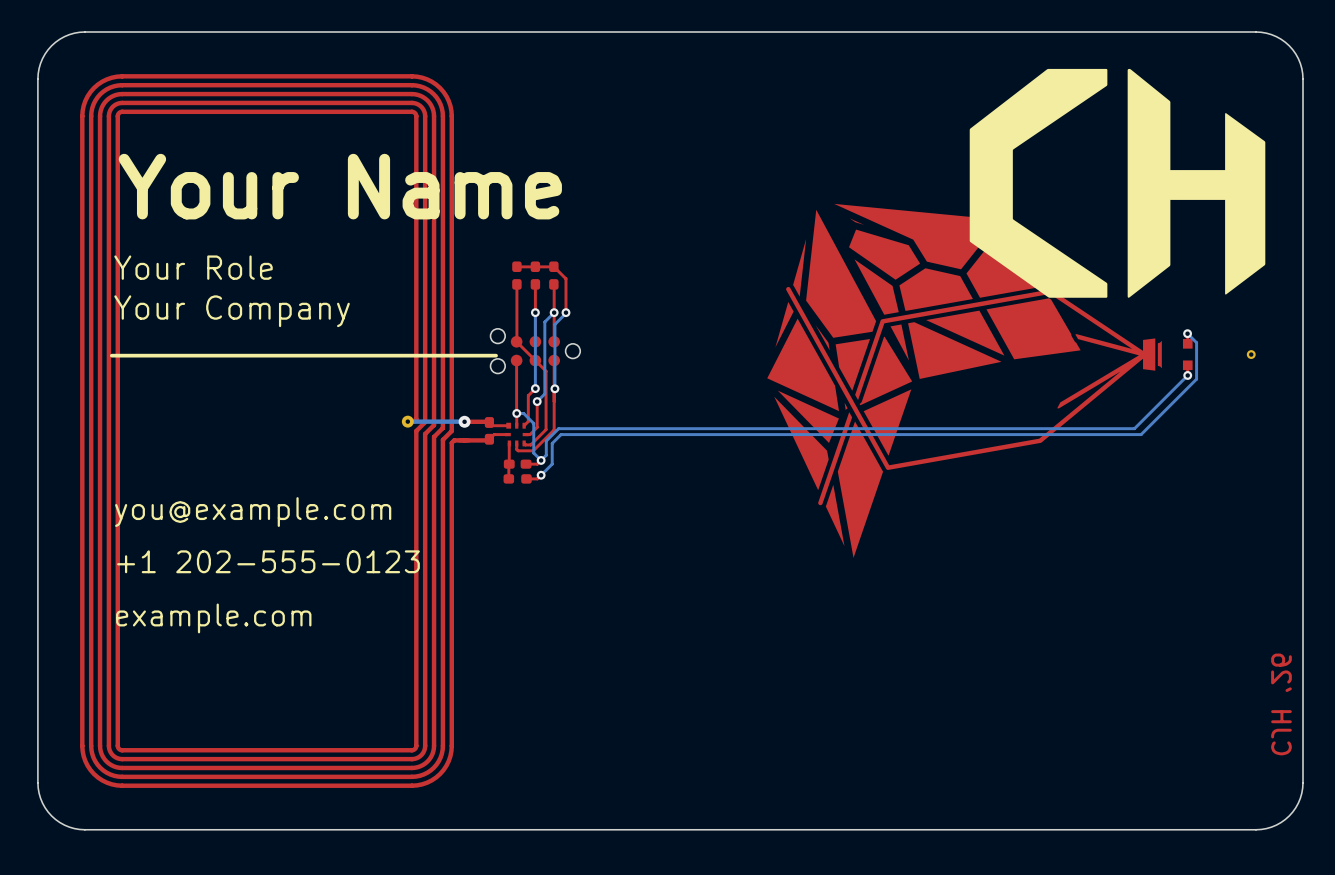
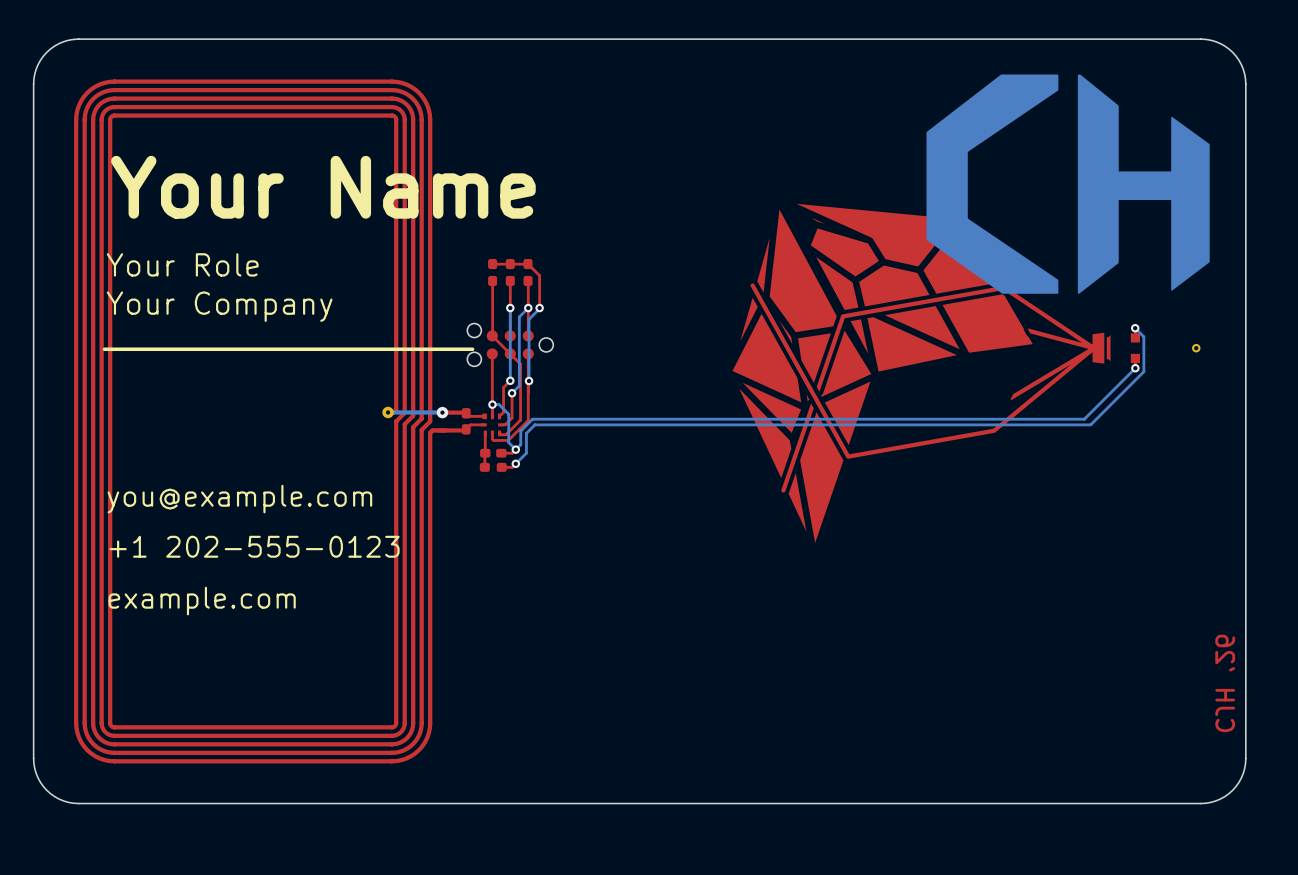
drawing shape: [969, 68, 1266, 298] -> [926, 74, 1210, 294]

